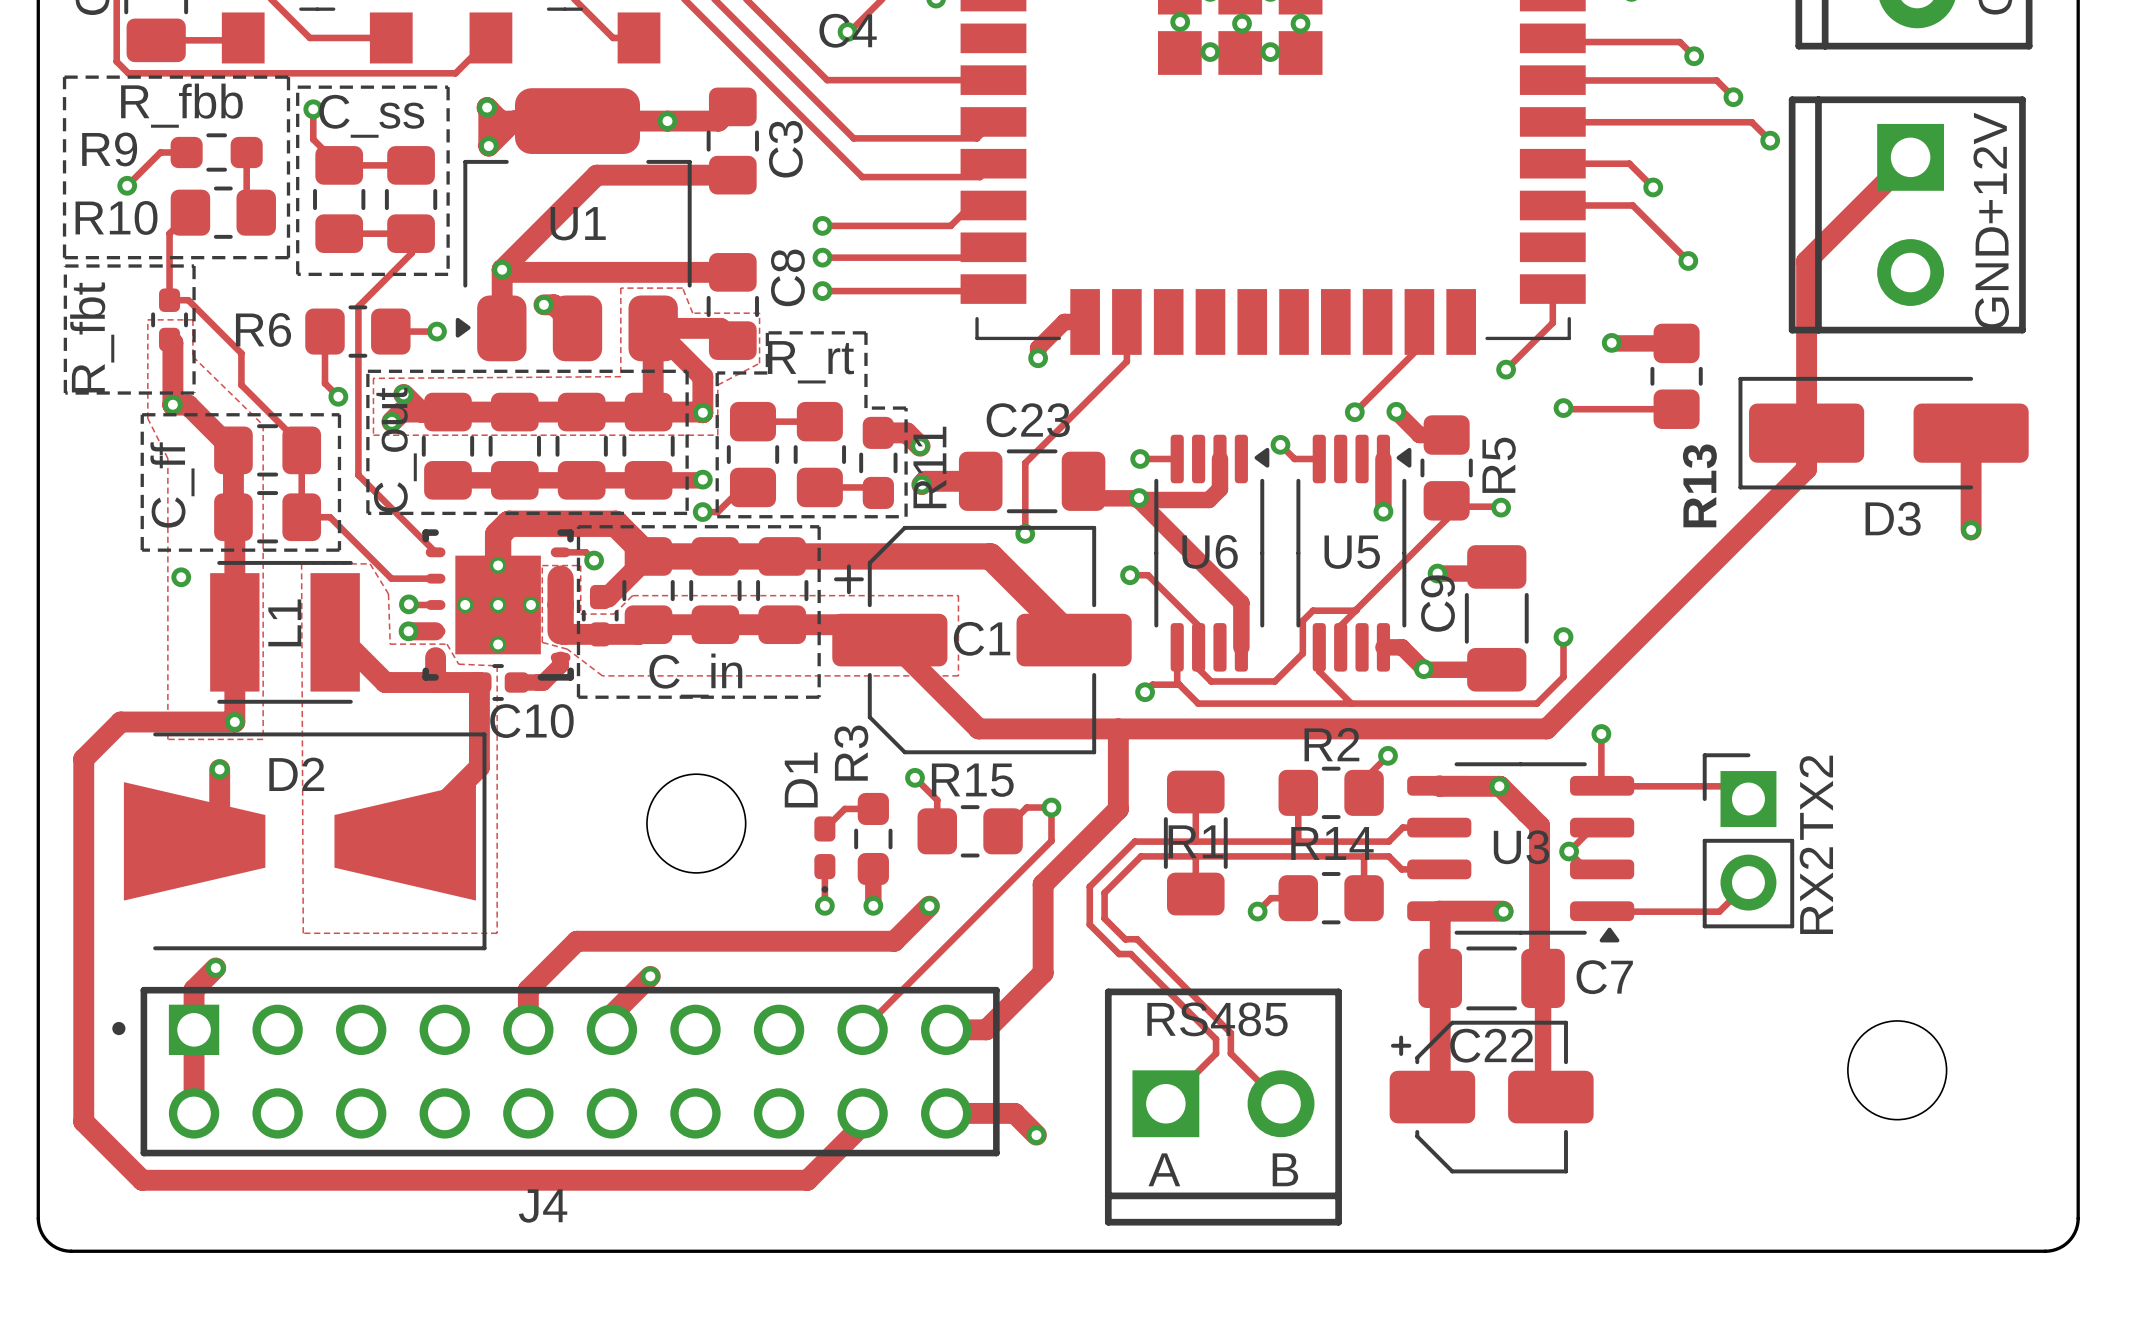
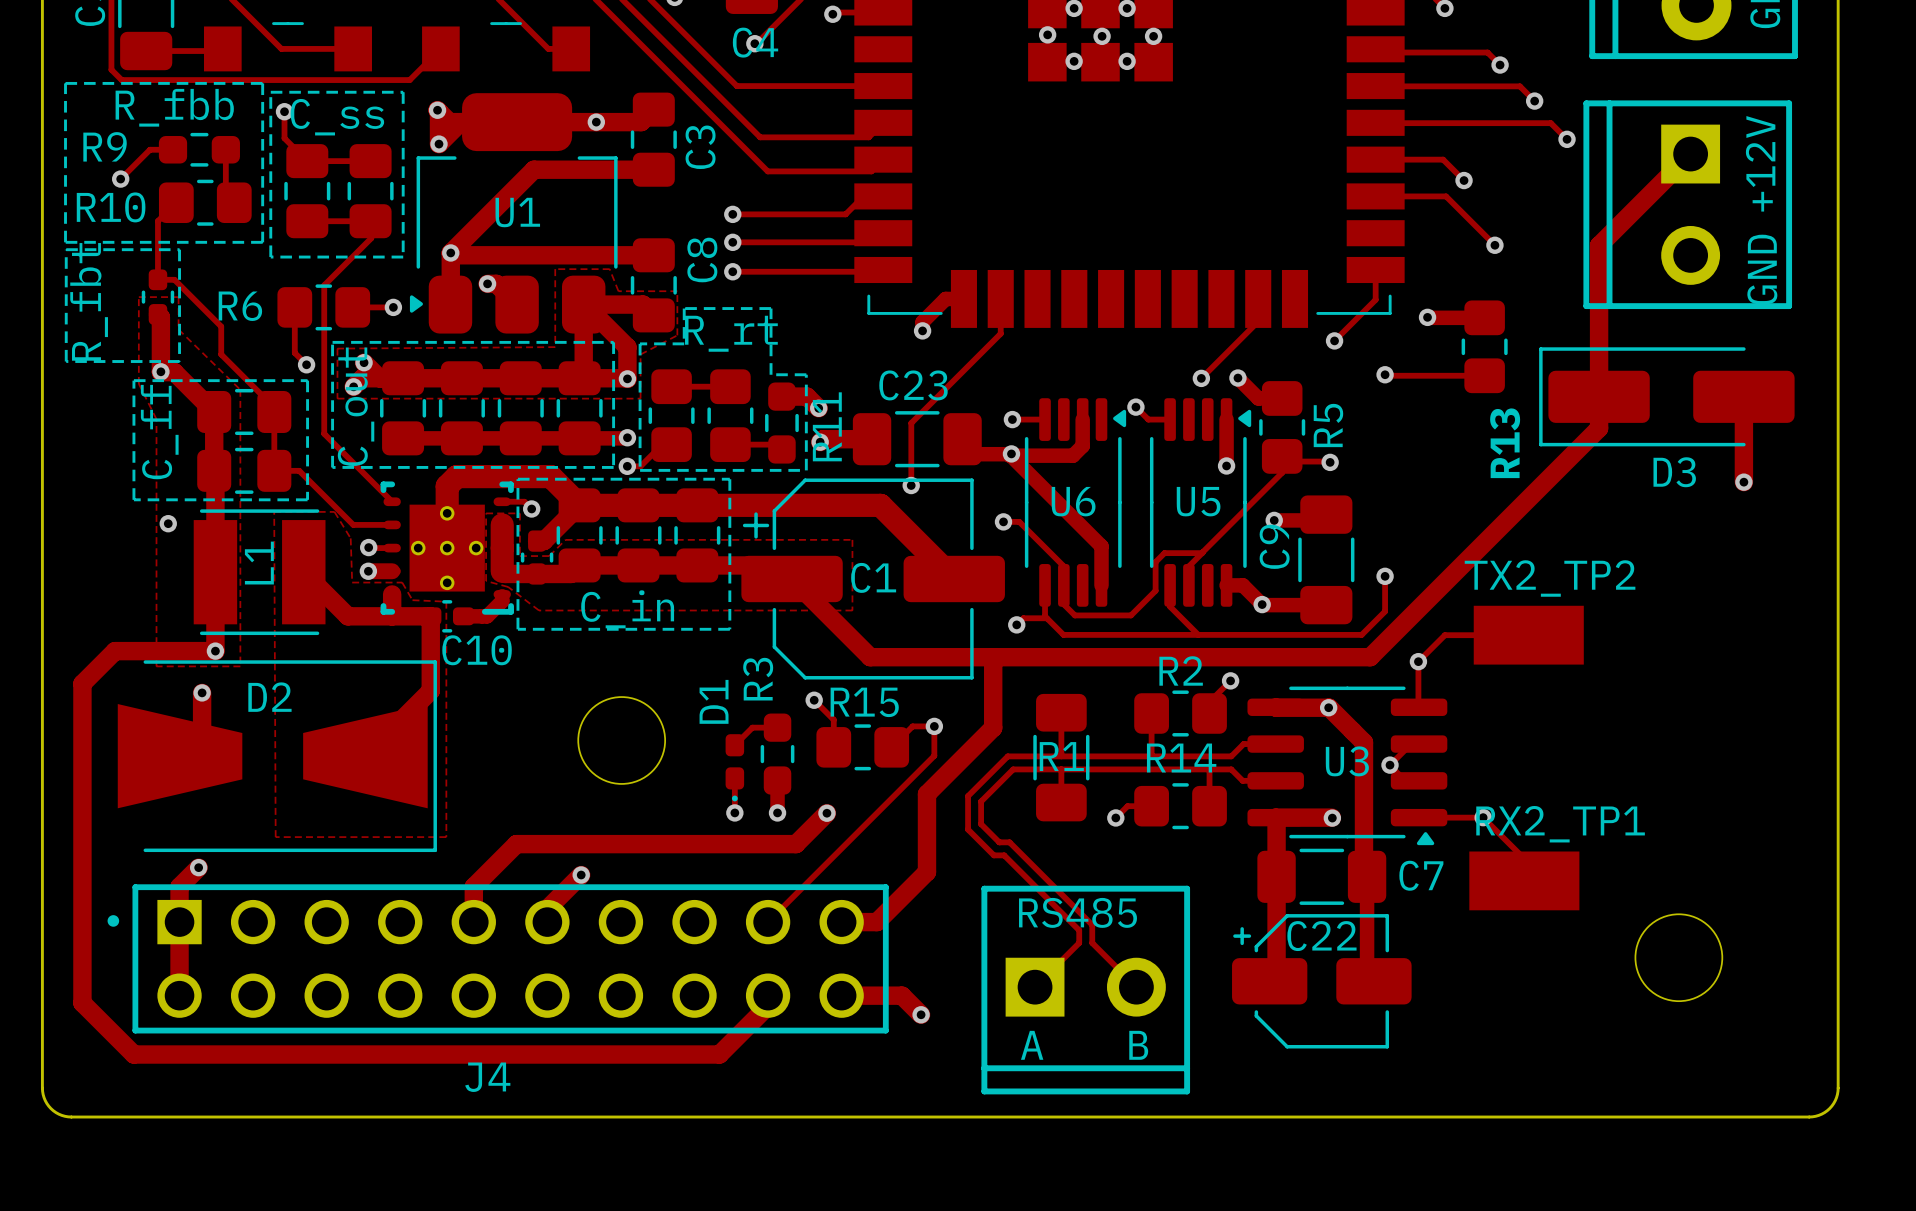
track: none -> (1528, 635) (1444, 635) (1418, 661)
TX2_TP2: none -> (1528, 635)
track: (1602, 786) (1724, 786) (1736, 799) -> none
text: TX2 (1816, 797) -> none
part: (1748, 840) -> none
track: (1748, 882) (1719, 911) (1602, 911) -> (1524, 880) (1524, 858) (1483, 817) (1419, 818)
text: RX2 (1816, 890) -> none
via: none -> (1483, 817)
RX2_TP1: none -> (1524, 880)

